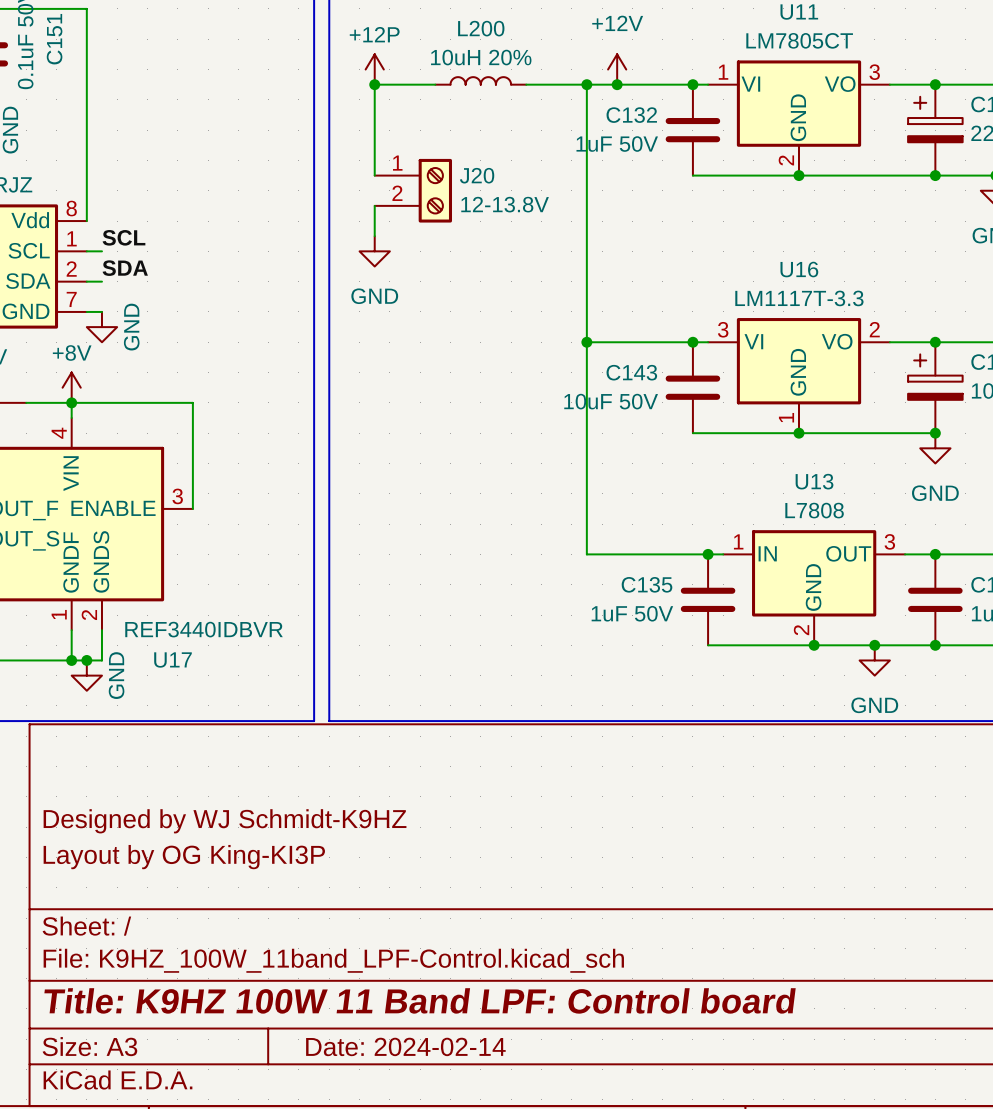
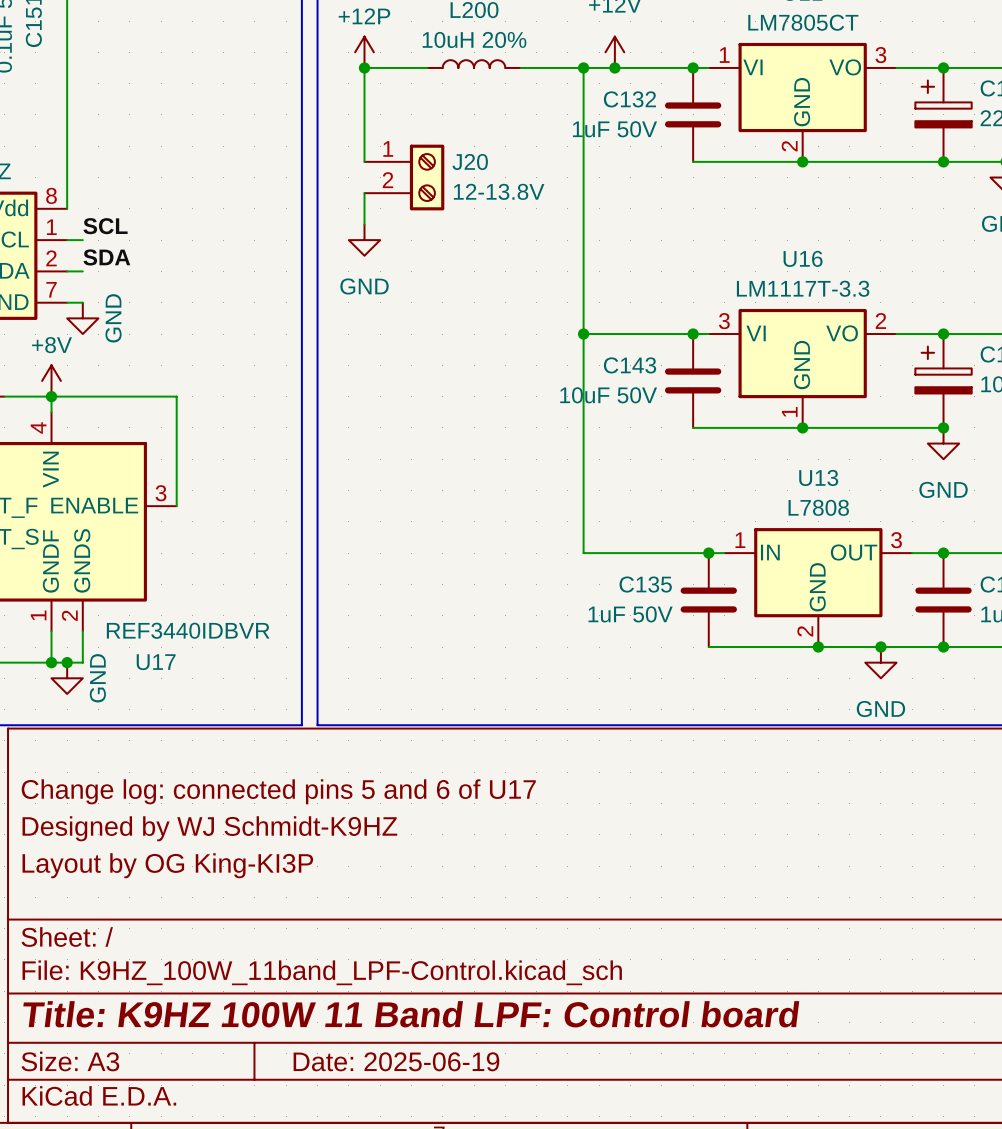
title block: none -> Change log: connected pins 5 and 6 of U17 (278, 791)
title block: Date: 2024-02-14 (405, 1046) -> Date: 2025-06-19 (396, 1061)

